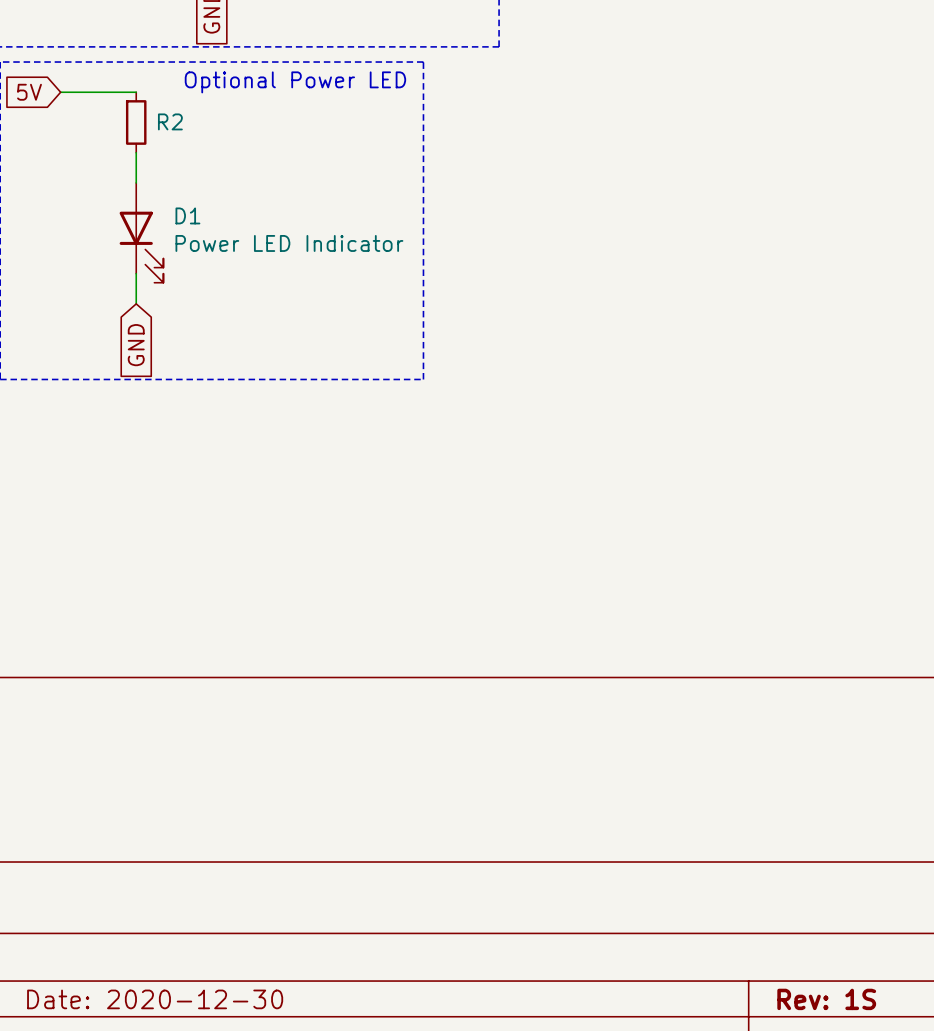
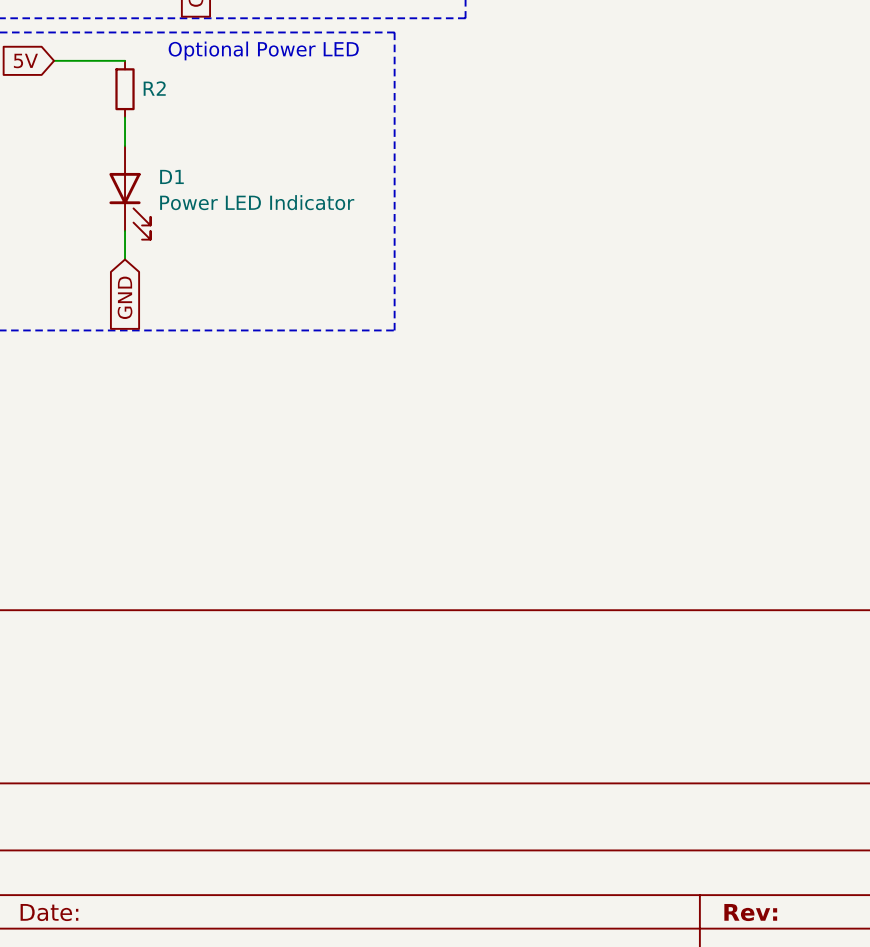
title block: Date: 2020-12-30 (155, 999) -> Date: (49, 912)
title block: Rev: 1S (826, 999) -> Rev: (750, 912)

